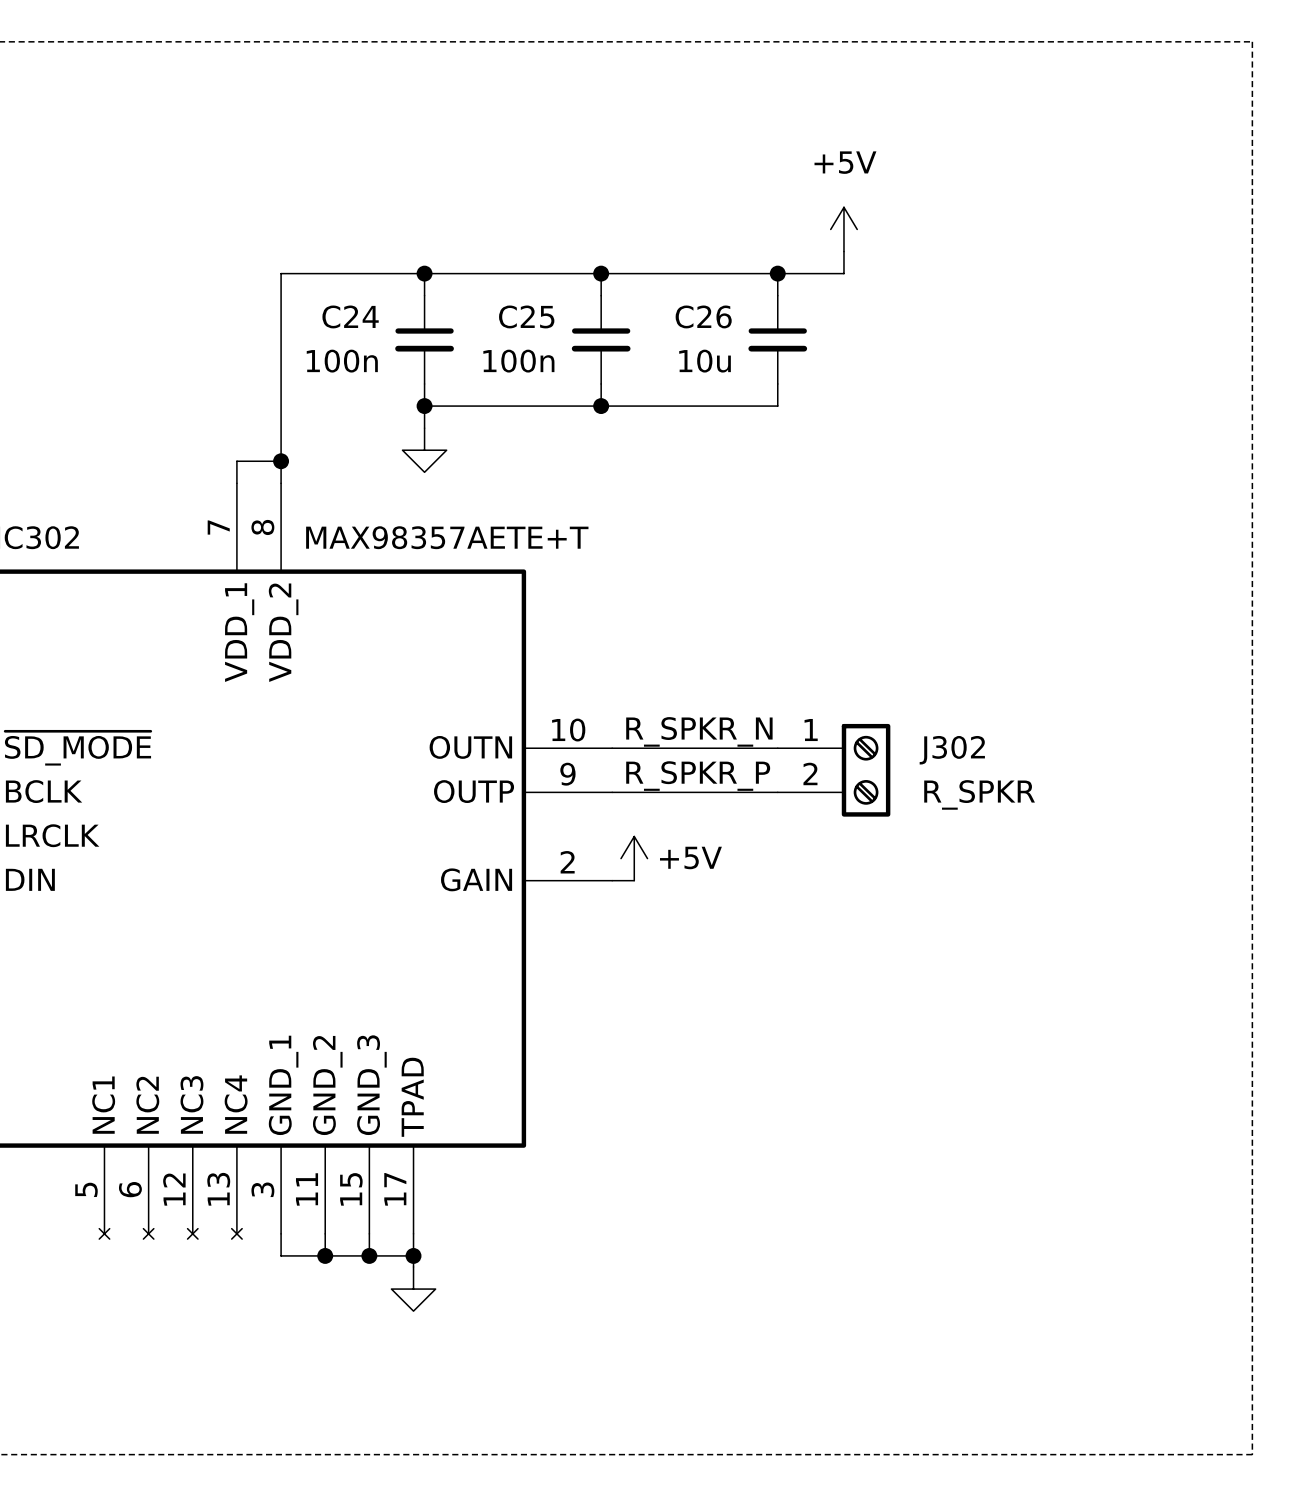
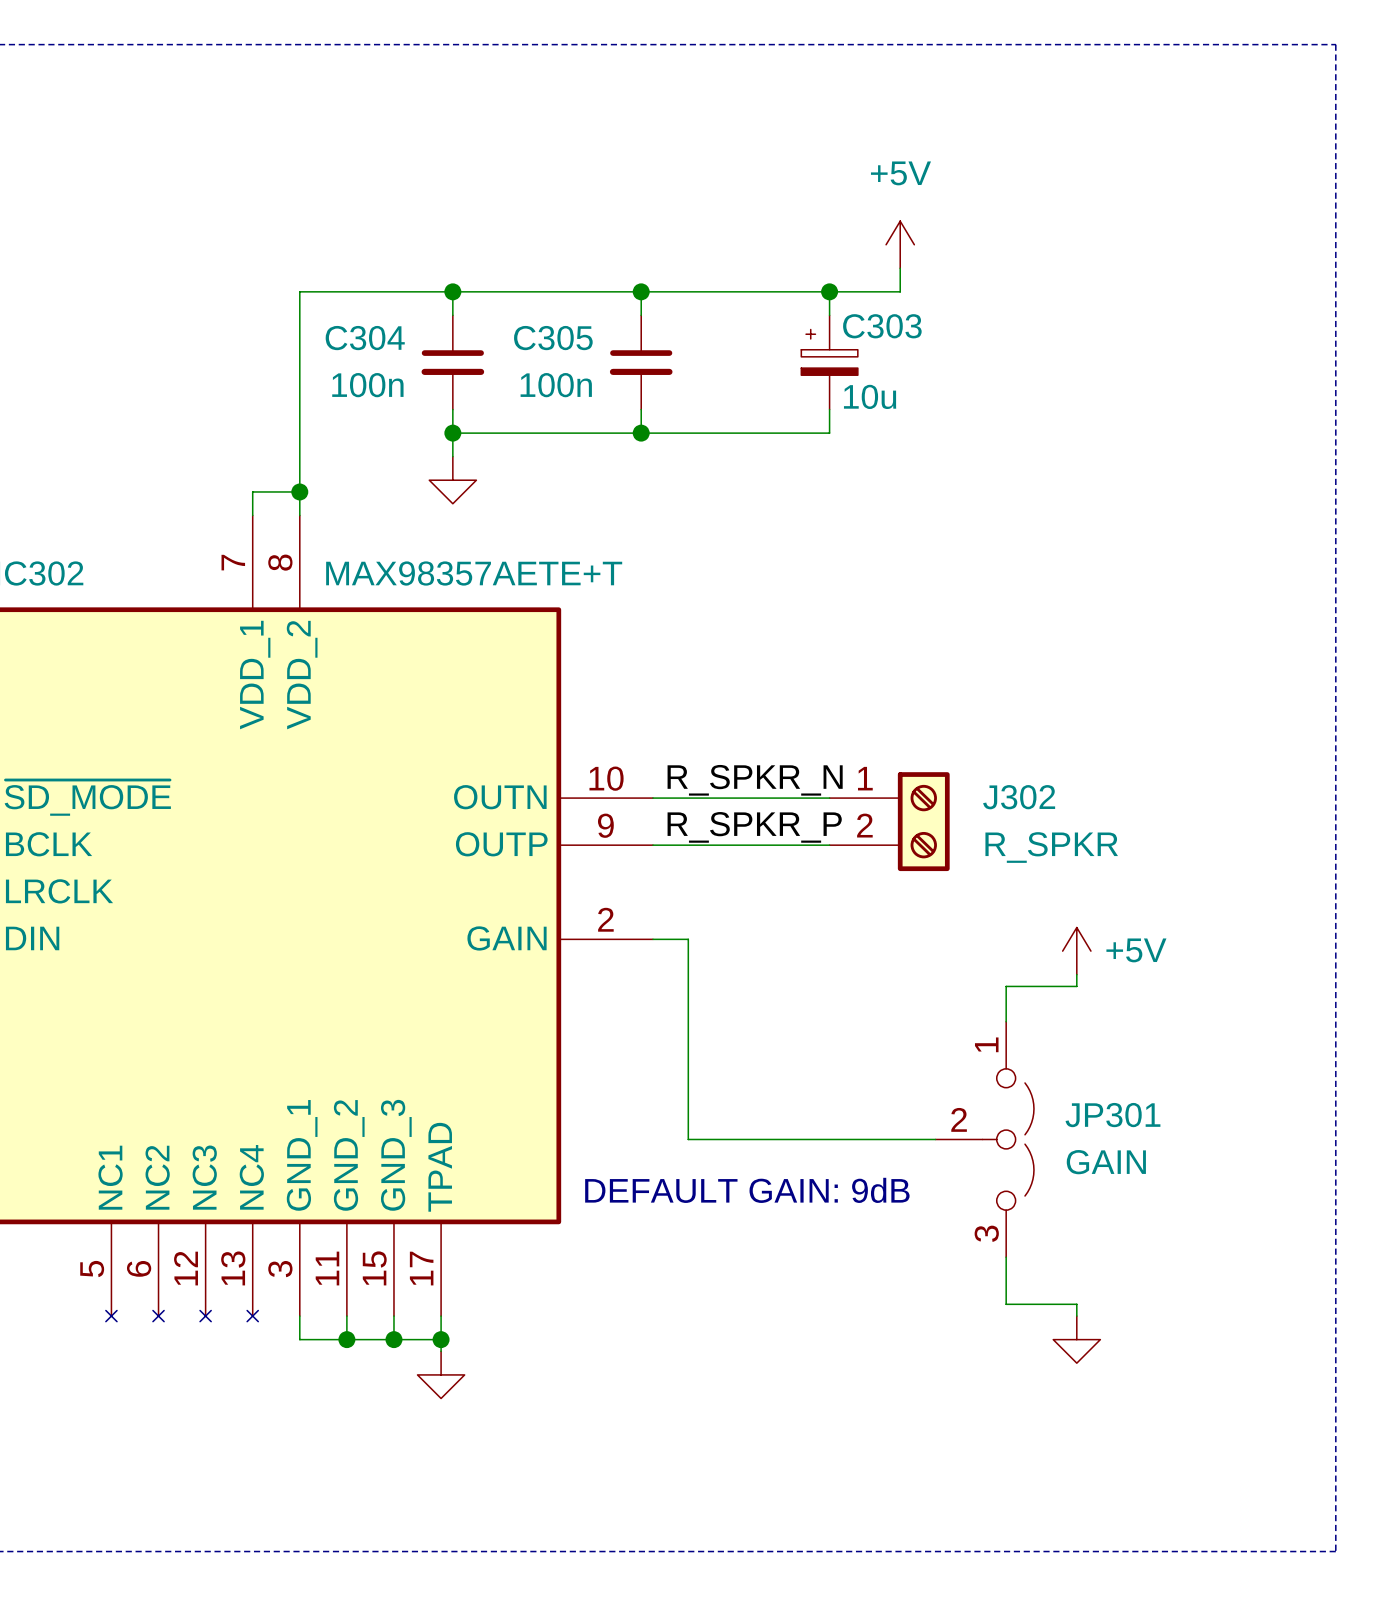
C24 name: C24 (350, 316) -> C304 (365, 338)
C25 name: C25 (526, 316) -> C305 (553, 338)
C26: 10u (777, 339) -> none
C303: none -> 10u (829, 362)
power symbol position: +5V (634, 858) -> +5V (1076, 951)
wire: none -> (676, 939) (688, 939) (688, 1139) (935, 1139)
wire: none -> (1076, 974) (1076, 986) (1006, 986) (1006, 1021)
JP301: none -> GAIN (984, 1139)
text: none -> DEFAULT GAIN: 9dB (747, 1190)
wire: none -> (1006, 1257) (1006, 1304) (1076, 1304) (1076, 1316)
power symbol: none -> (1076, 1339)

